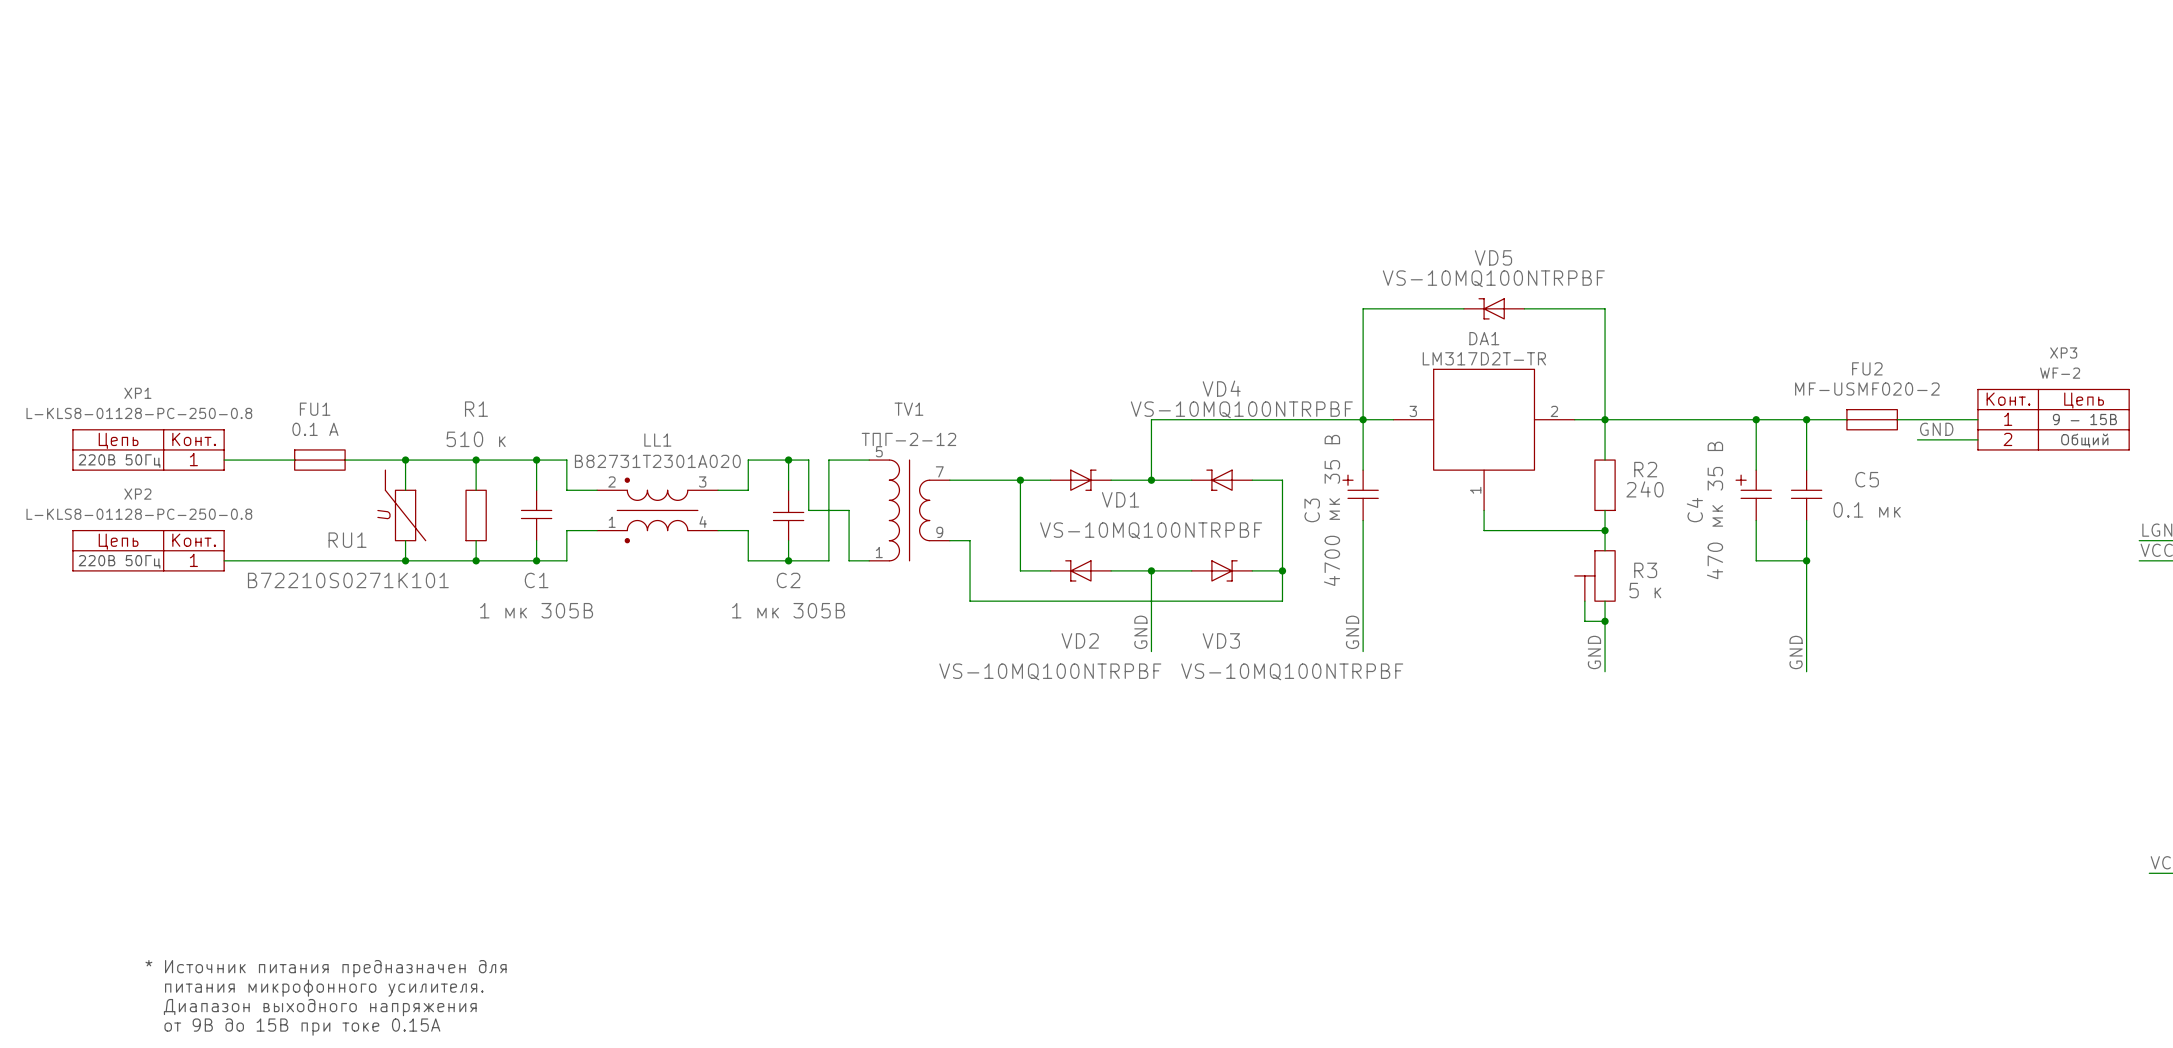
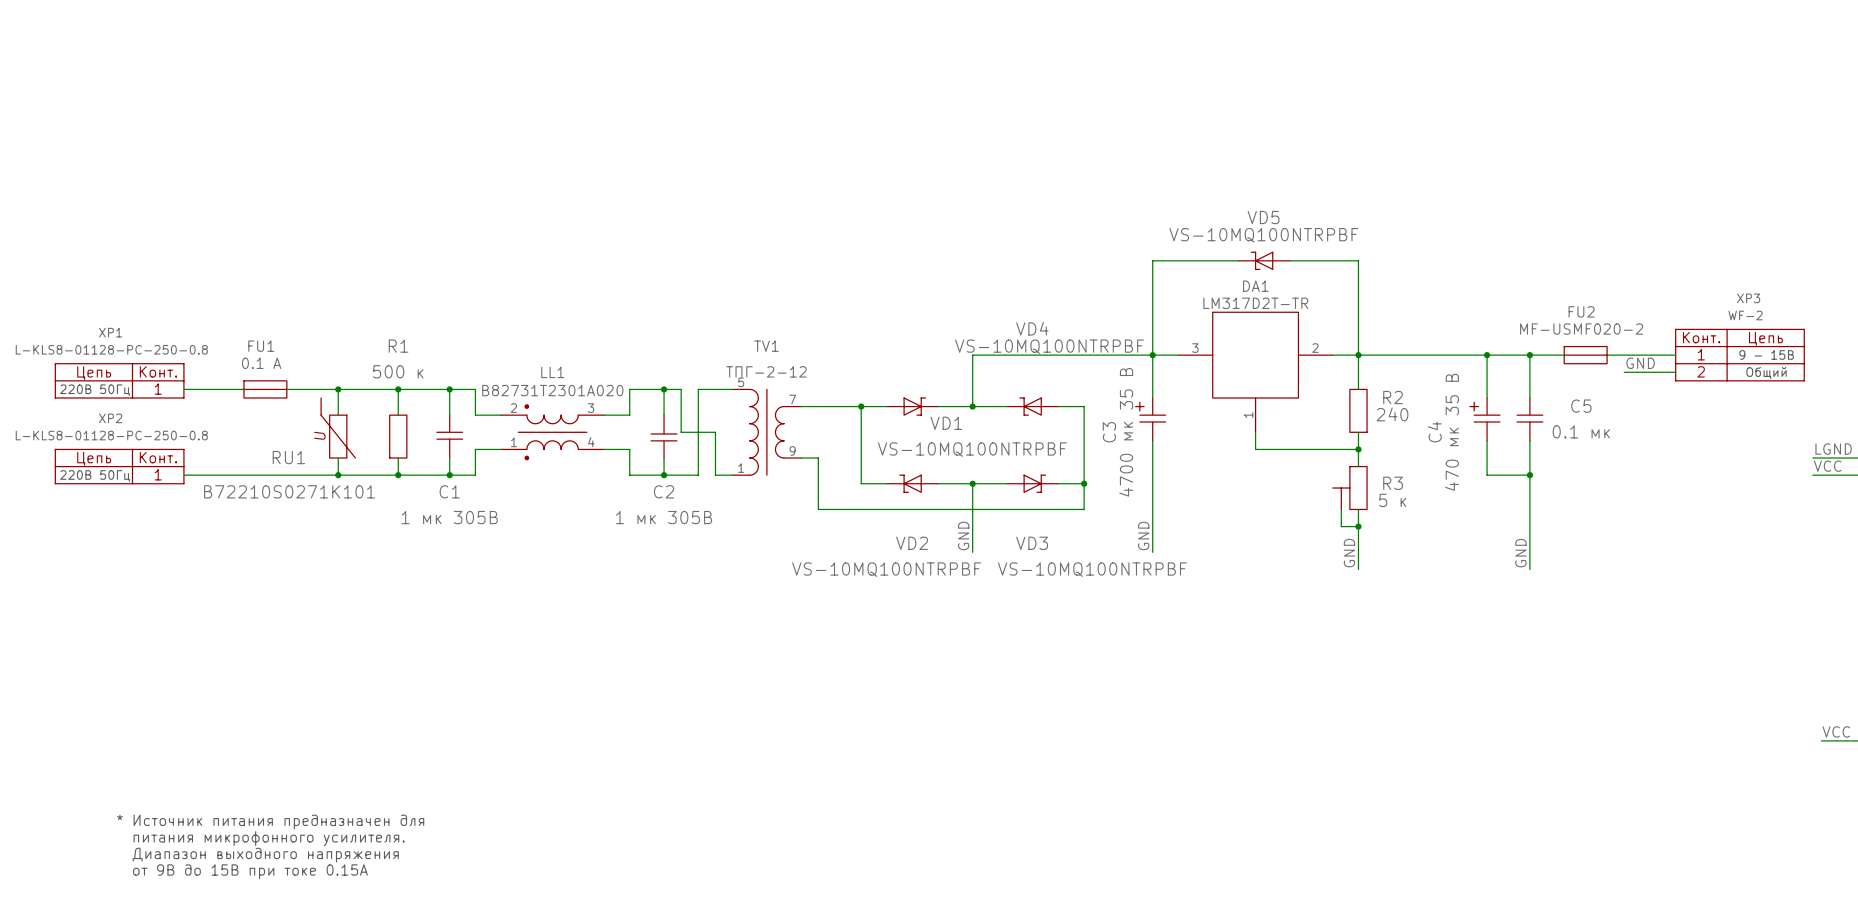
R1 value: 510 к (476, 439) -> 500 к (398, 371)

